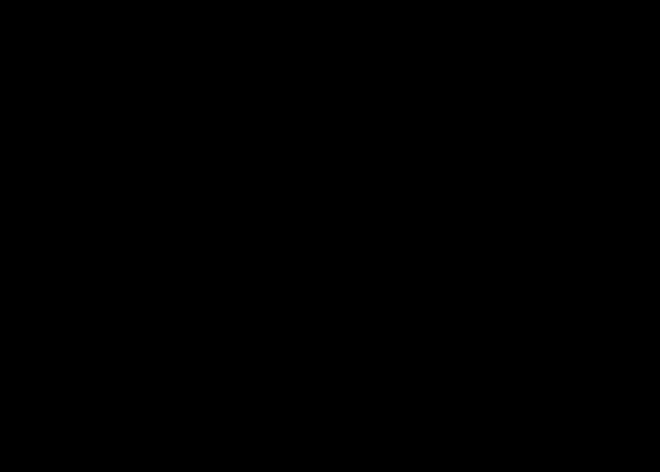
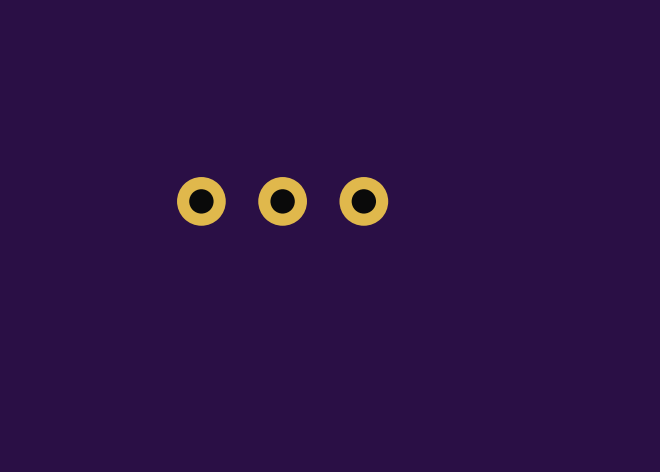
part: none -> (282, 201)

